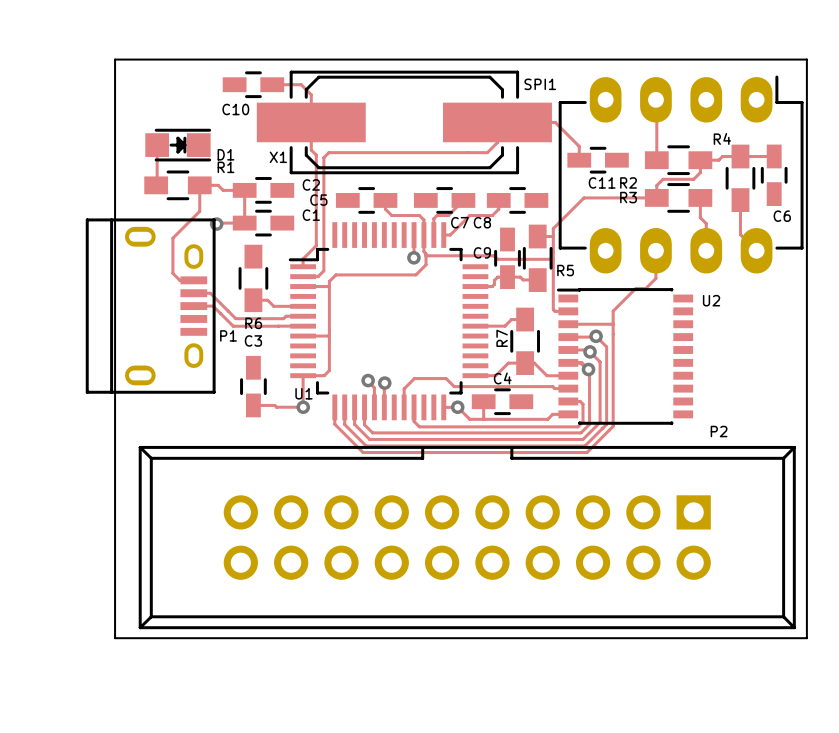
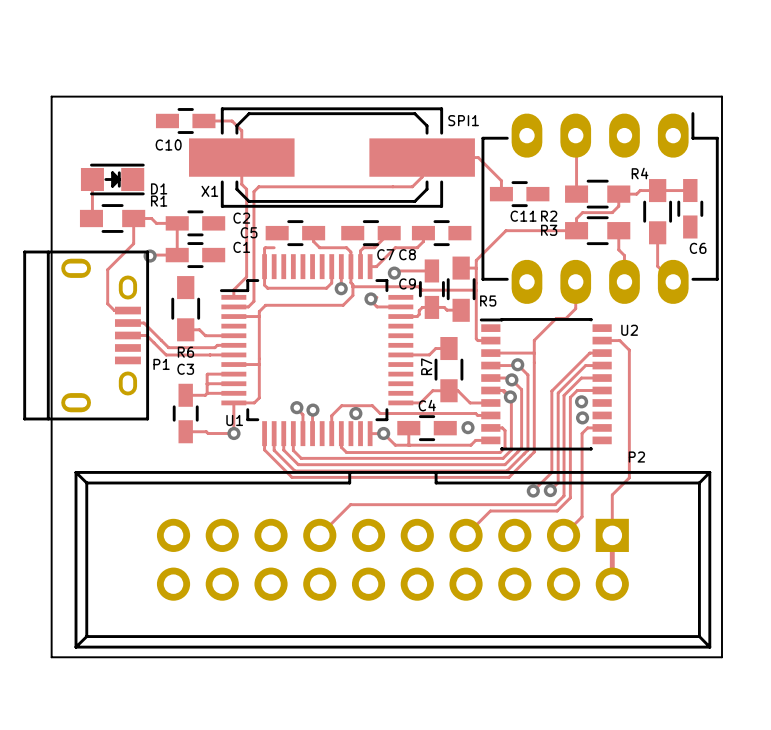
track: none -> (274, 247) (264, 248) (264, 285) (267, 288) (326, 288) (331, 283) (331, 266)
track: none -> (431, 270) (396, 270) (394, 273)
via: none -> (394, 273)
track: none -> (376, 297) (373, 303) (377, 306) (400, 306)
via: none -> (370, 298)
track: none -> (602, 340) (619, 340) (629, 350) (629, 477) (612, 494) (612, 584)
track: none -> (602, 353) (589, 353) (551, 391) (551, 472) (533, 491)
track: none -> (602, 365) (585, 365) (558, 393) (558, 482) (550, 490)
track: none -> (233, 374) (207, 374) (207, 393)
track: none -> (602, 378) (581, 378) (564, 395) (564, 495) (555, 504) (350, 504) (319, 535)
track: none -> (233, 383) (207, 384)
track: none -> (602, 390) (577, 390) (570, 397) (570, 497) (557, 511) (490, 511) (466, 535)
track: none -> (233, 393) (185, 395)
via: none -> (581, 401)
via: none -> (355, 413)
via: none -> (582, 417)
via: none -> (467, 427)
track: none -> (602, 427) (587, 427) (582, 433) (582, 516) (563, 535)
via: none -> (533, 491)
via: none -> (550, 490)

